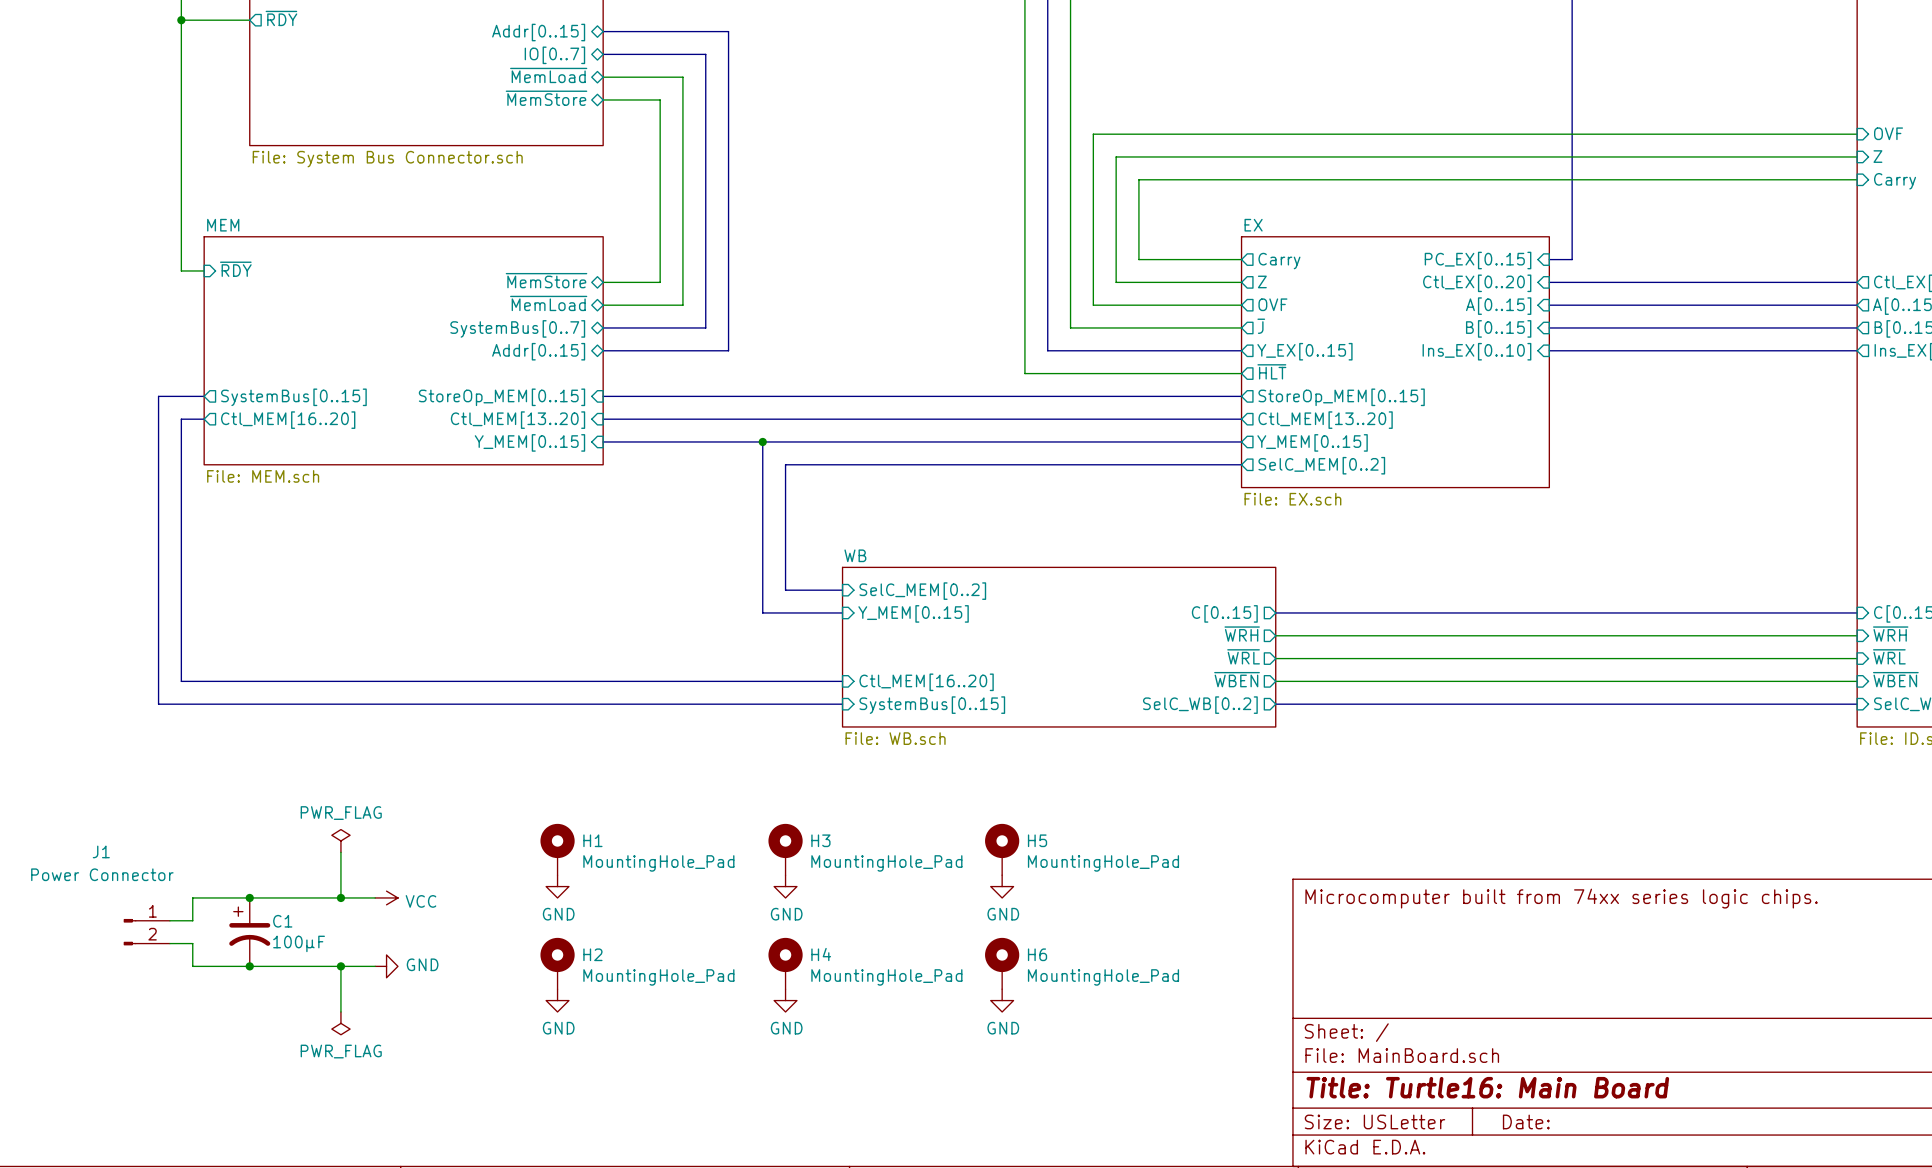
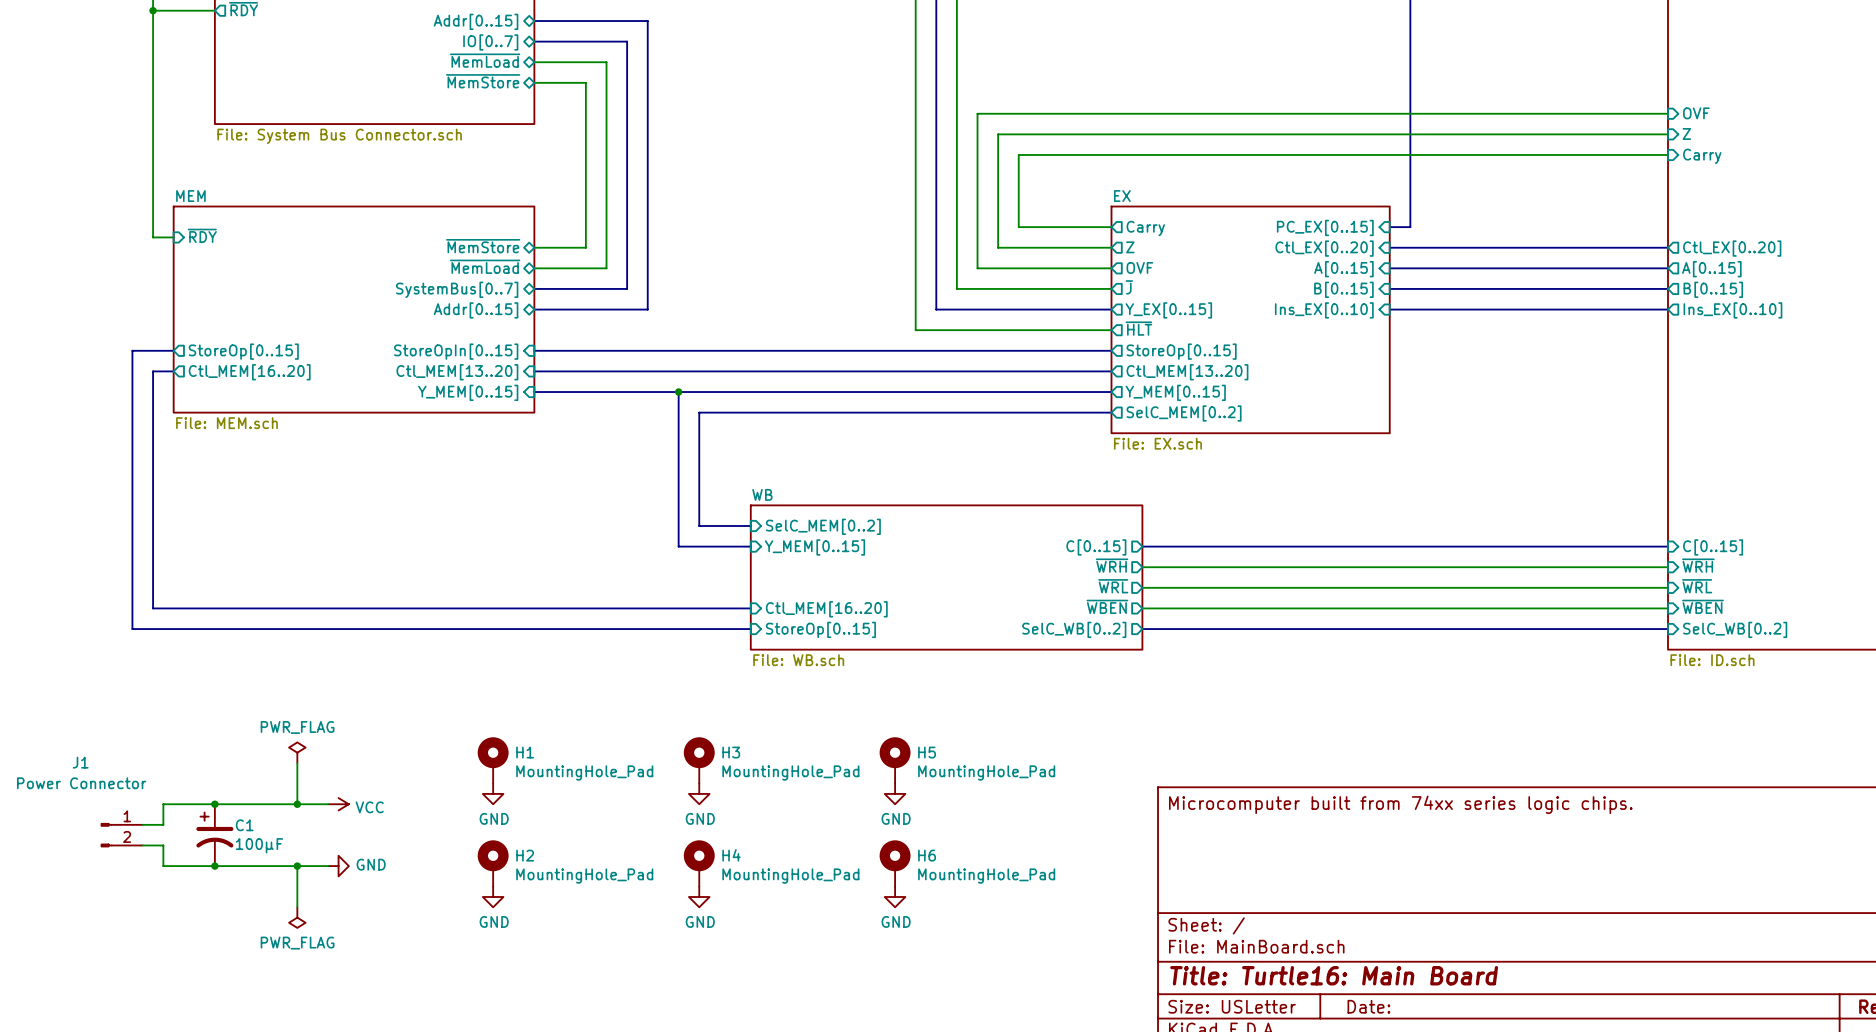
sheet pin: SystemBus[0..15] (293, 397) -> StoreOp[0..15] (243, 351)
sheet pin: StoreOp_MEM[0..15] (502, 397) -> StoreOpIn[0..15] (456, 351)
sheet pin: StoreOp_MEM[0..15] (1341, 397) -> StoreOp[0..15] (1181, 351)
sheet pin: SystemBus[0..15] (932, 705) -> StoreOp[0..15] (820, 629)

